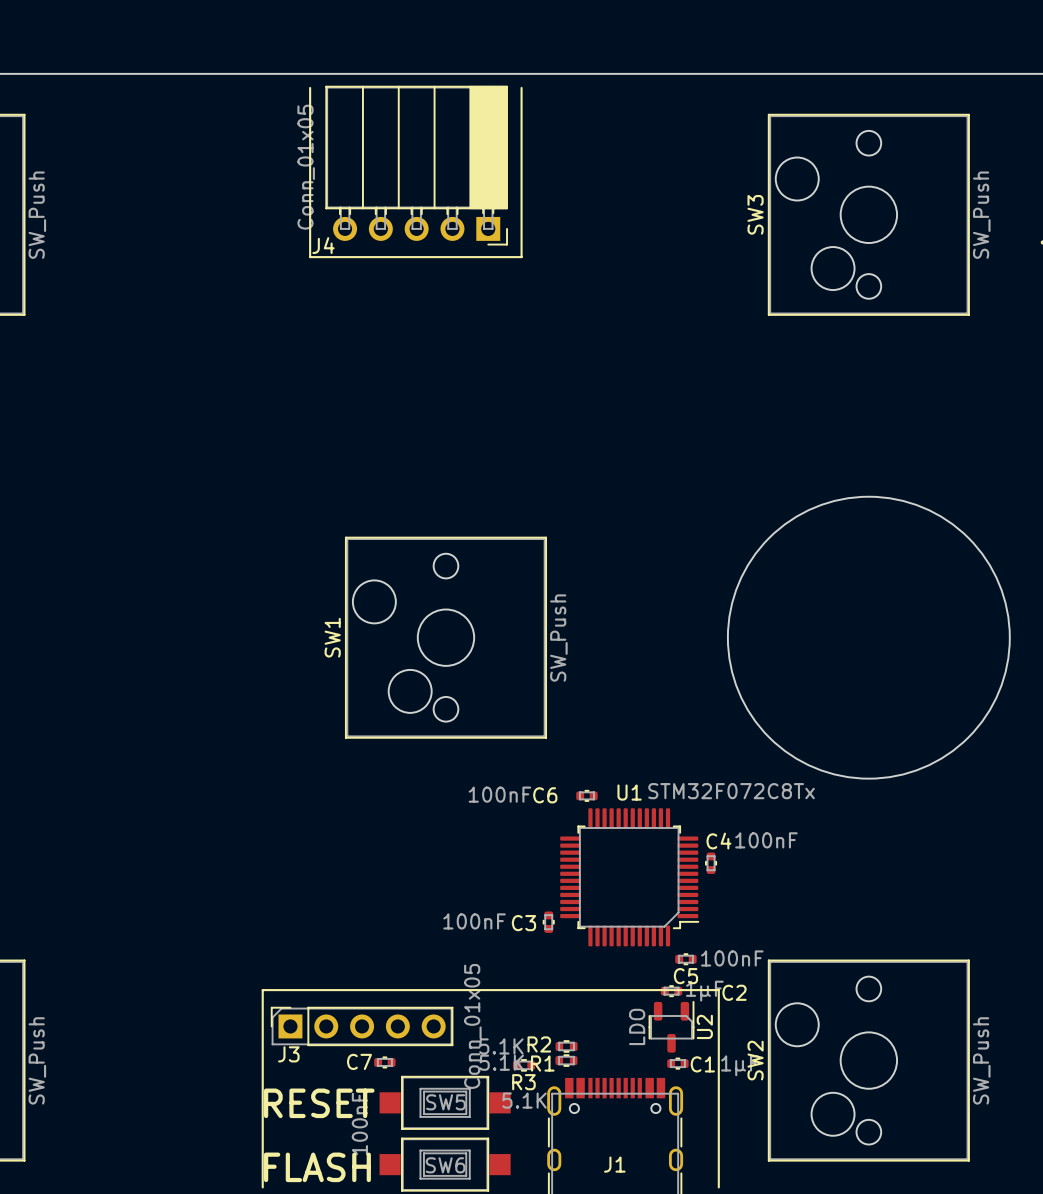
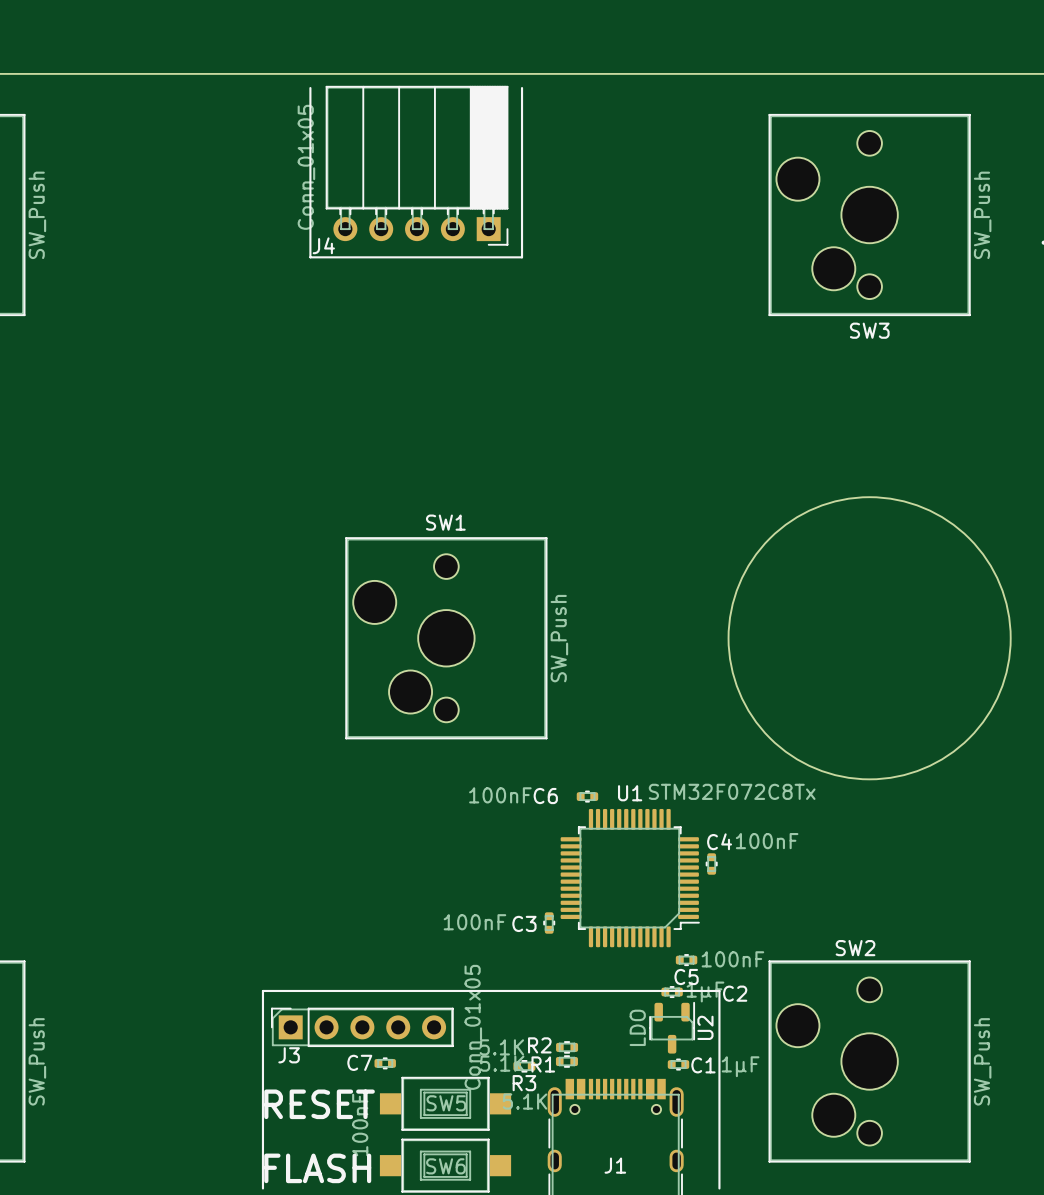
SW3 name rotation: 0° (755, 214) -> 90° clockwise (869, 330)
SW3 name position: SW3 (755, 214) -> SW3 (869, 330)
SW1 name rotation: 0° (332, 637) -> 90° clockwise (445, 522)
SW1 name position: SW1 (332, 637) -> SW1 (445, 522)
SW2 name rotation: 0° (755, 1060) -> 90° clockwise (855, 948)
SW2 name position: SW2 (755, 1060) -> SW2 (855, 948)

